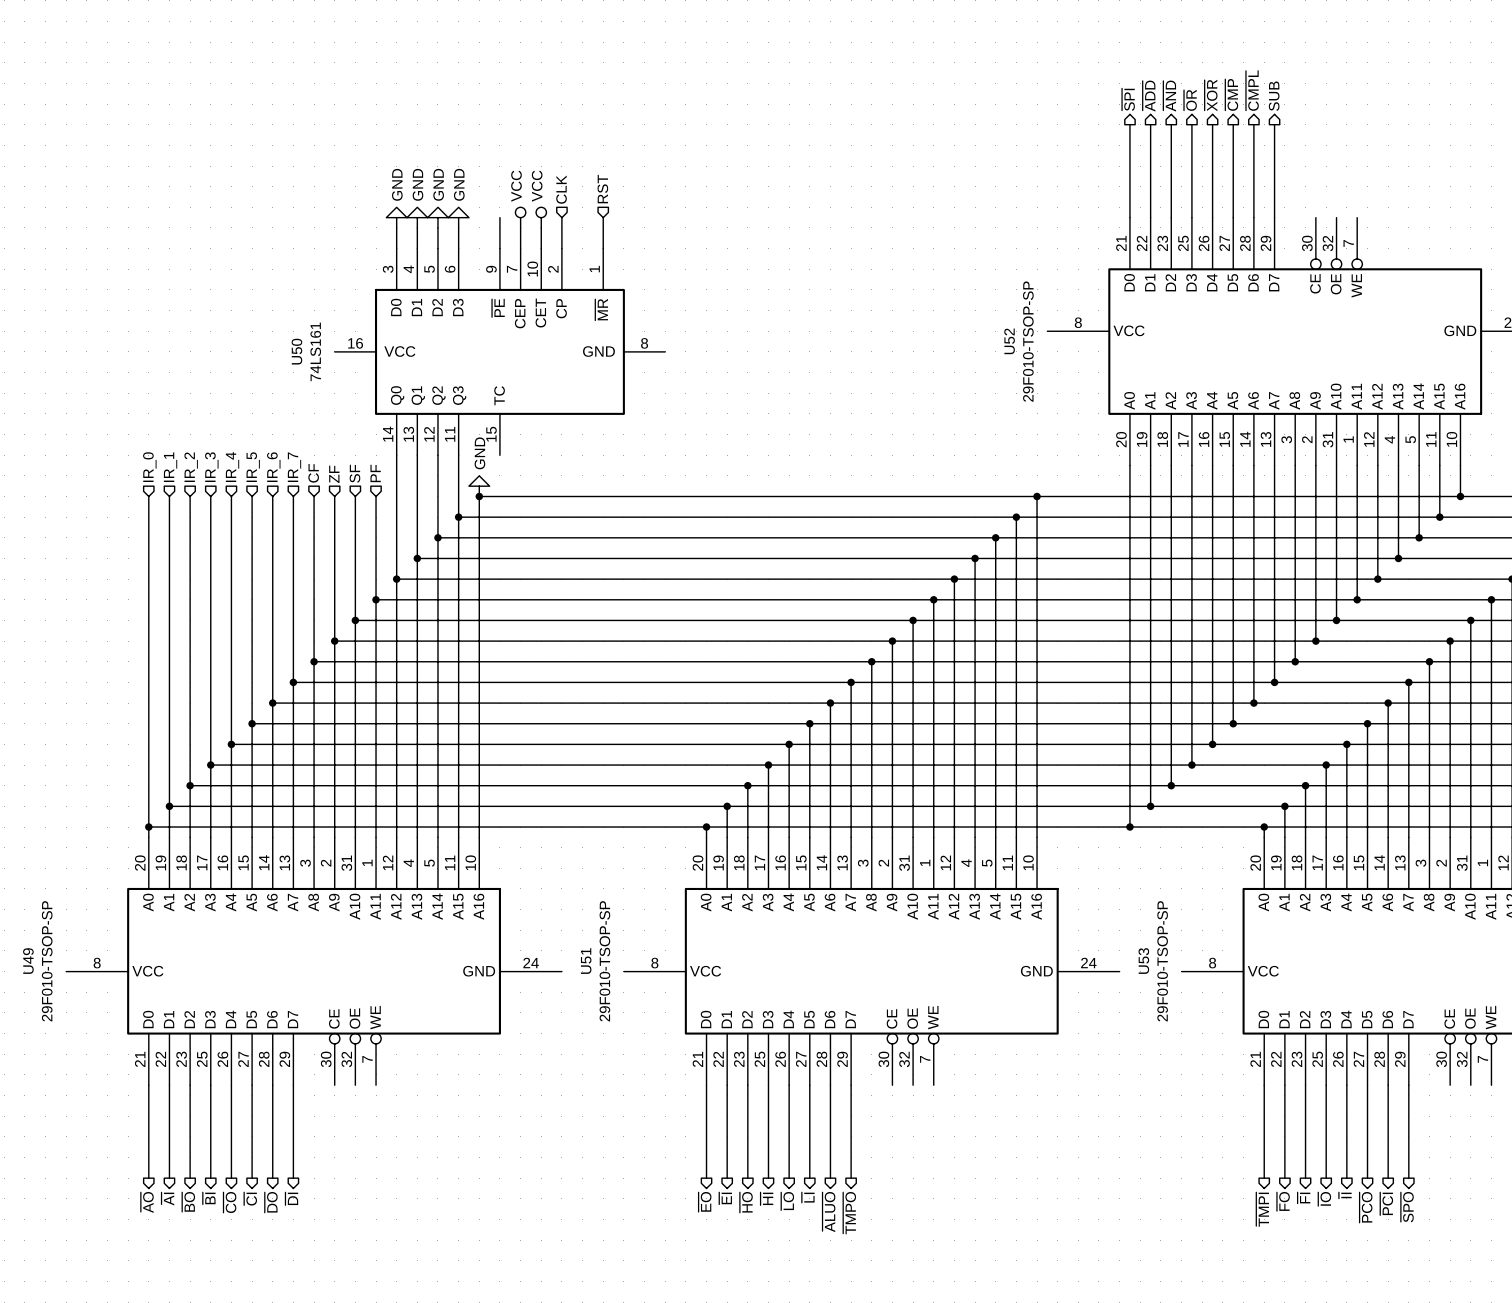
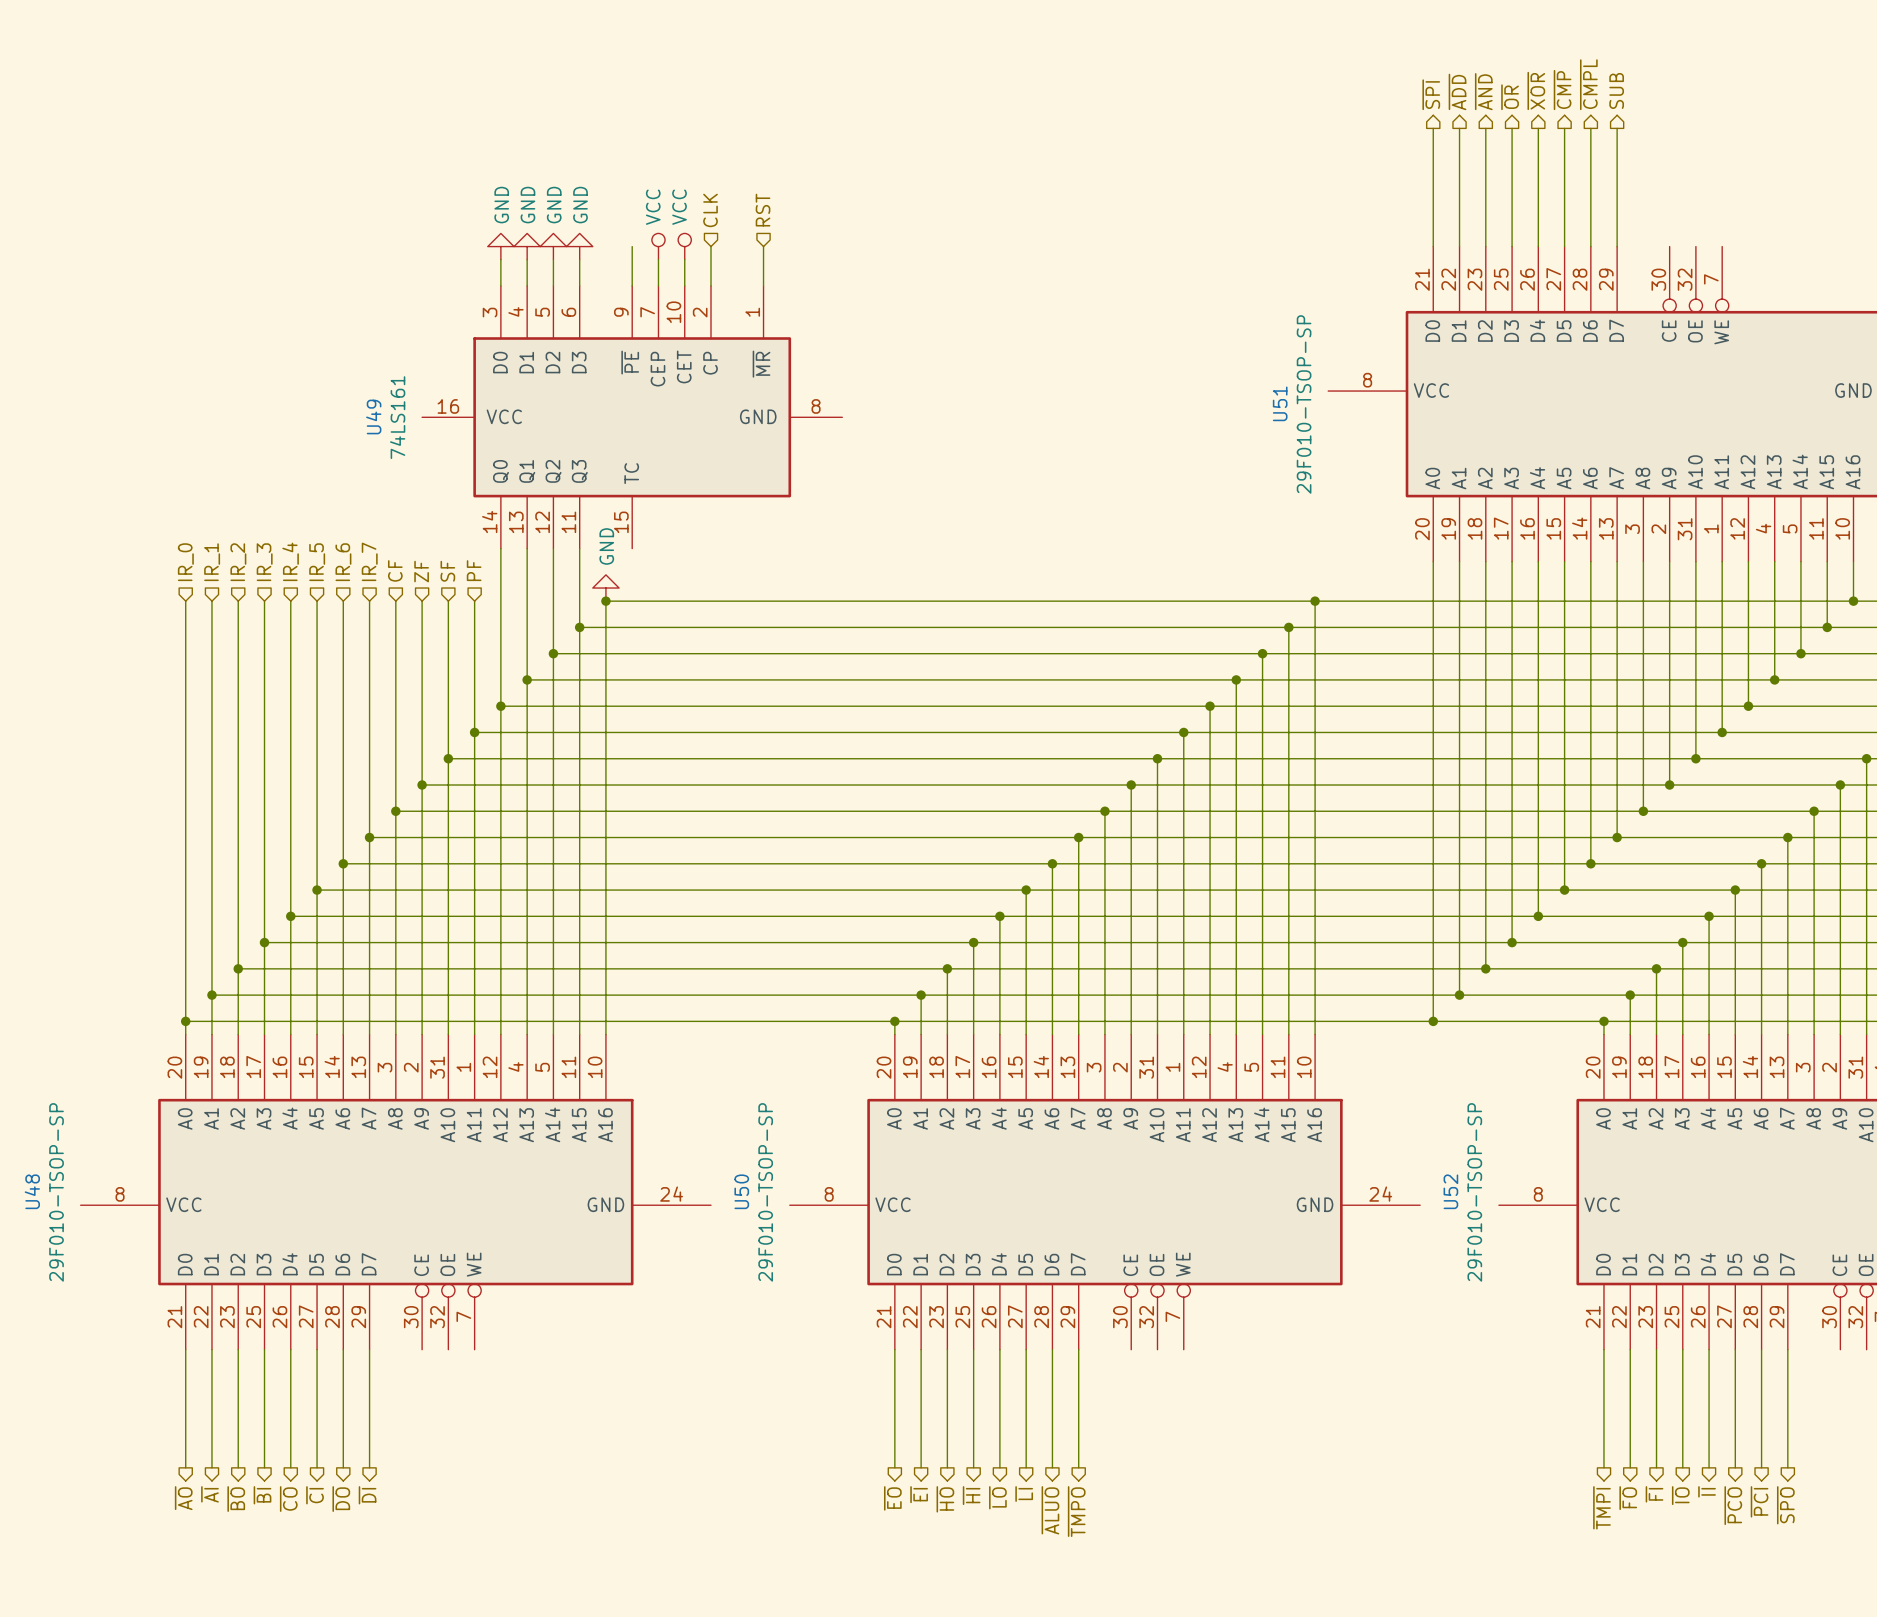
U52 name: U52 (1009, 341) -> U51 (1280, 403)
U50 name: U50 (296, 351) -> U49 (373, 416)
U49 name: U49 (28, 961) -> U48 (32, 1191)
U51 name: U51 (586, 961) -> U50 (741, 1191)
U53 name: U53 (1143, 961) -> U52 (1450, 1191)

